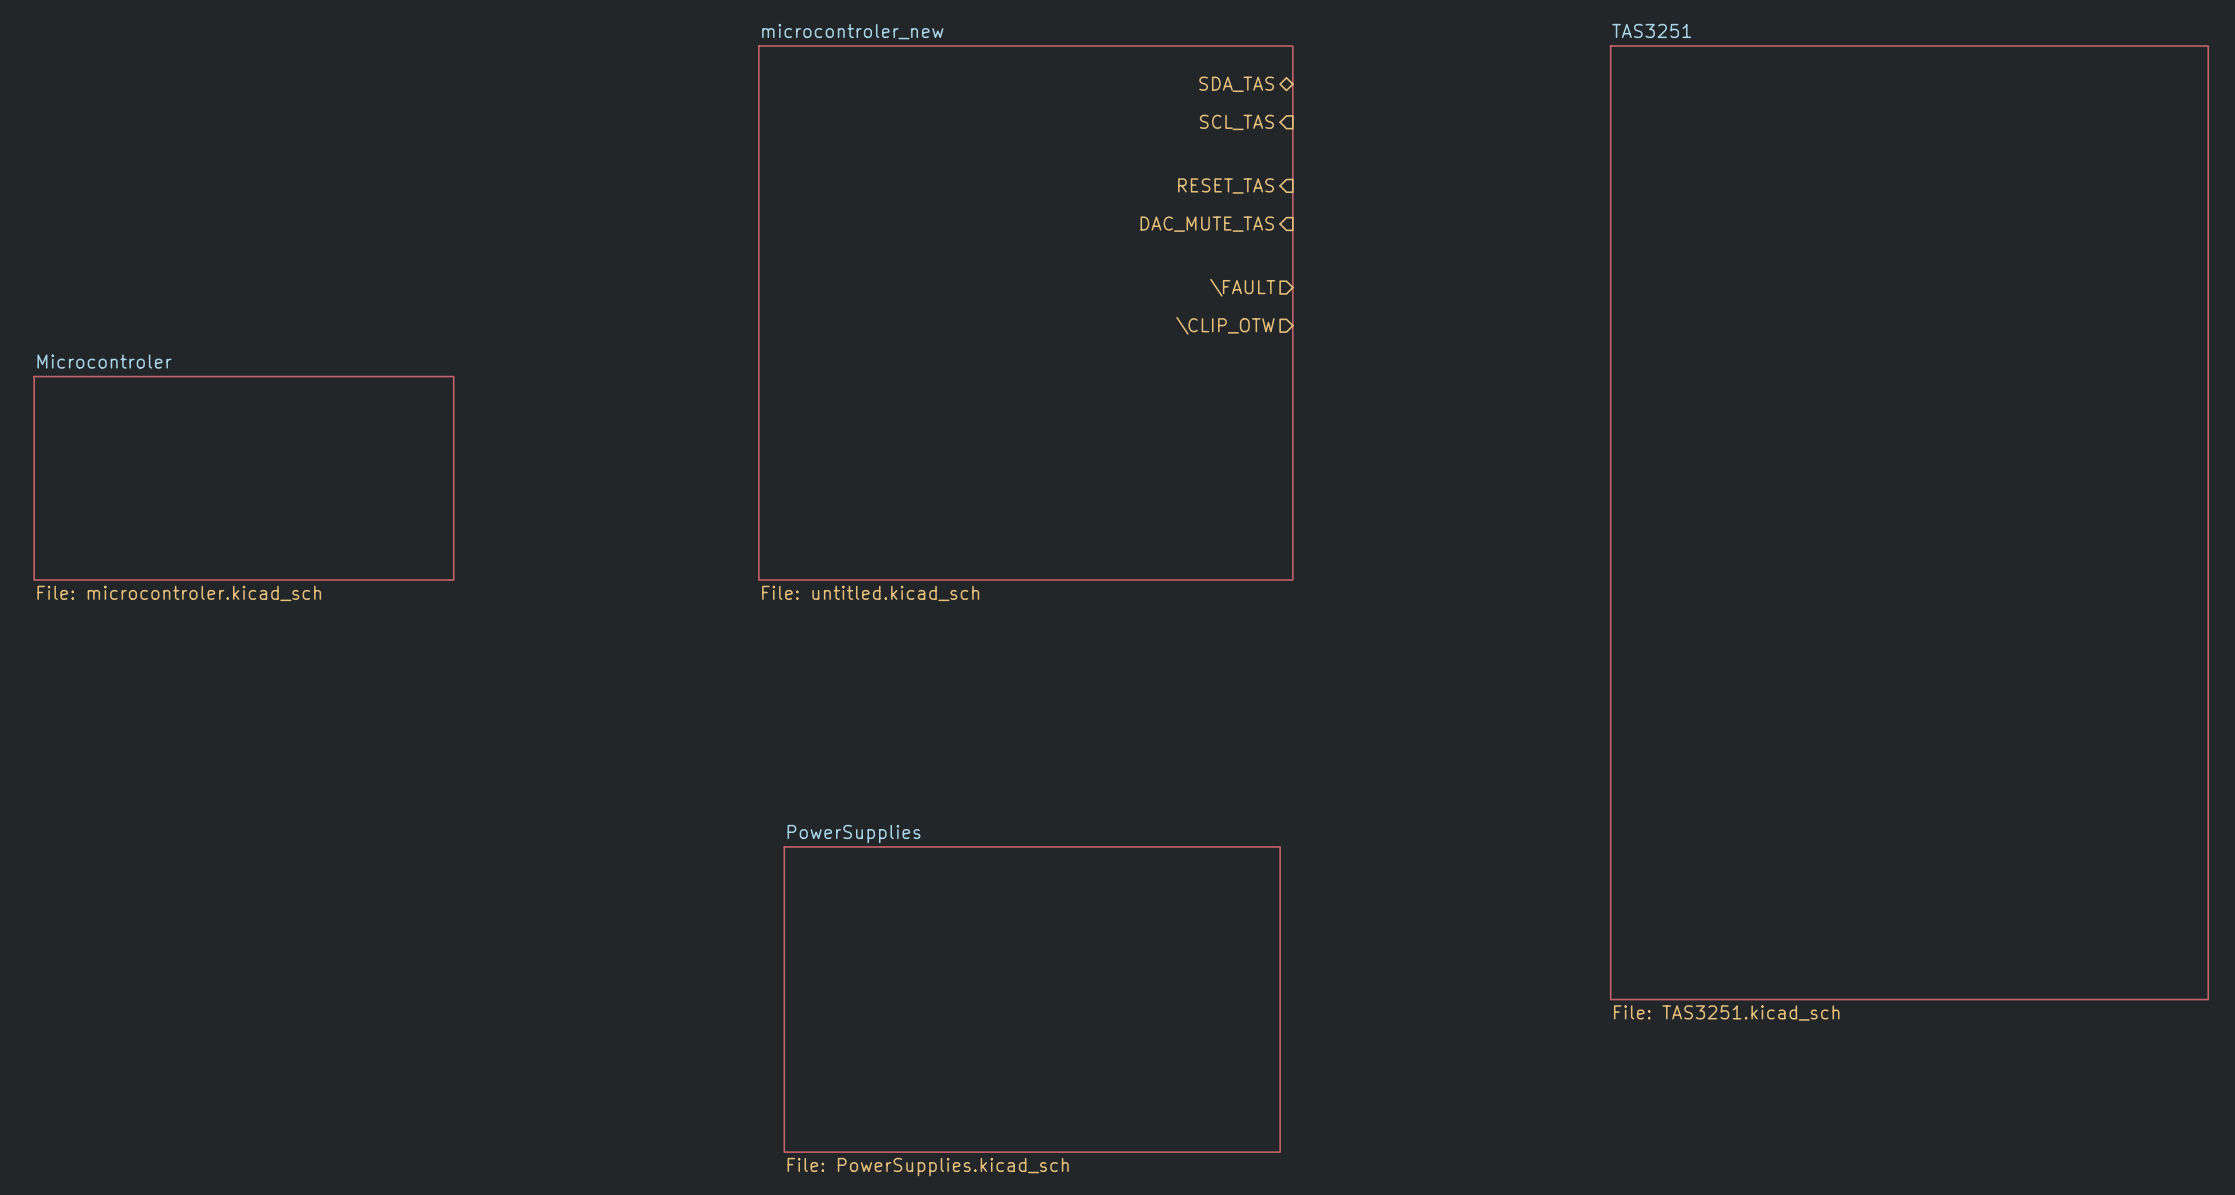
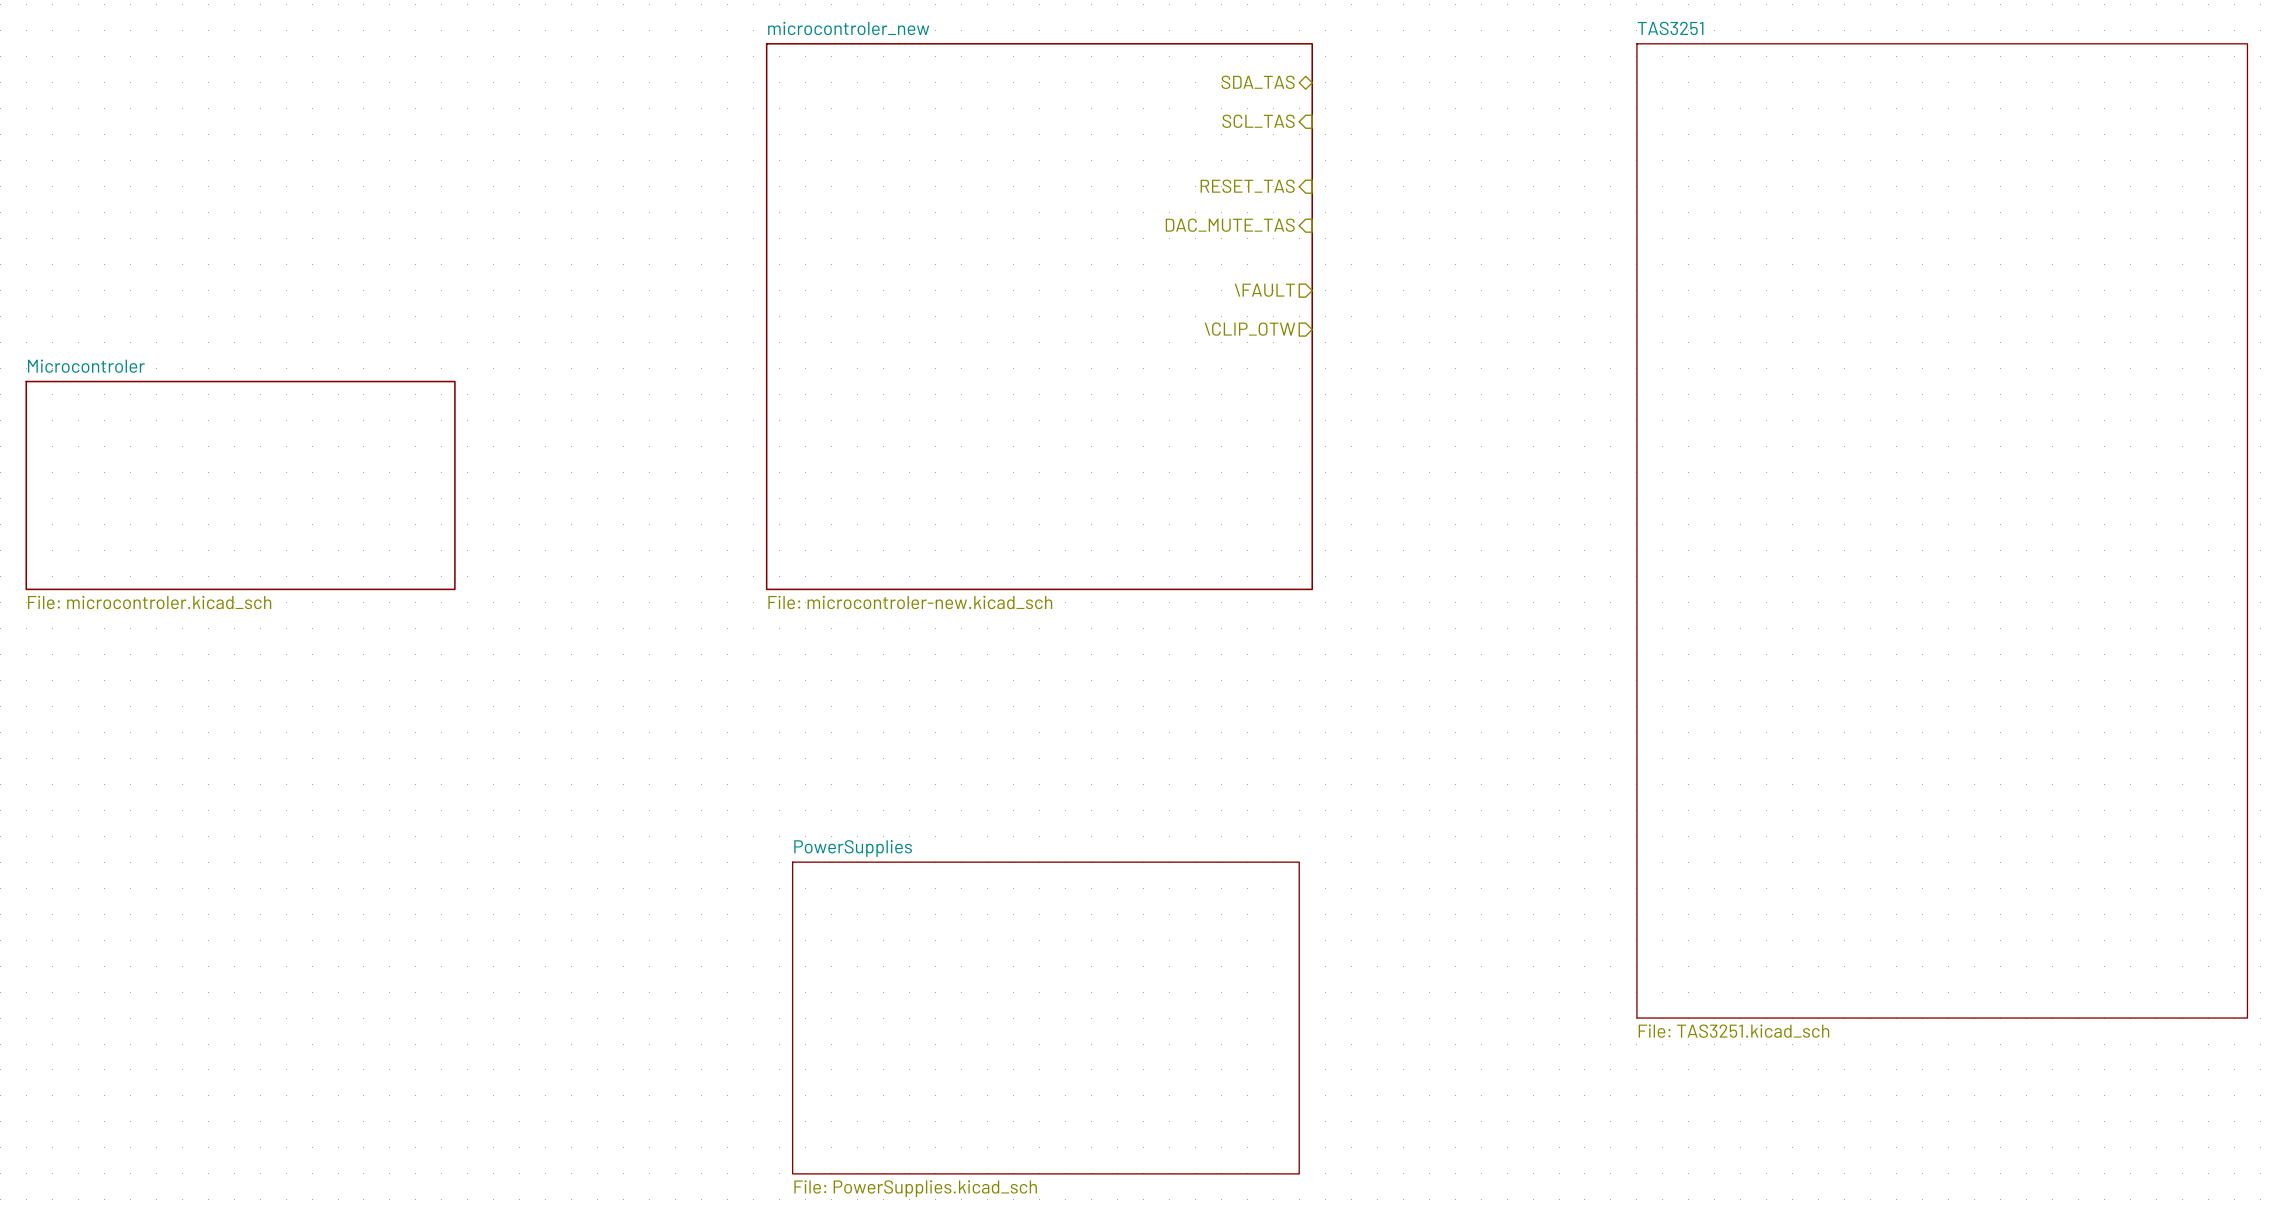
sheet microcontroler_new value: File: untitled.kicad_sch (870, 593) -> File: microcontroler-new.kicad_sch (910, 602)

